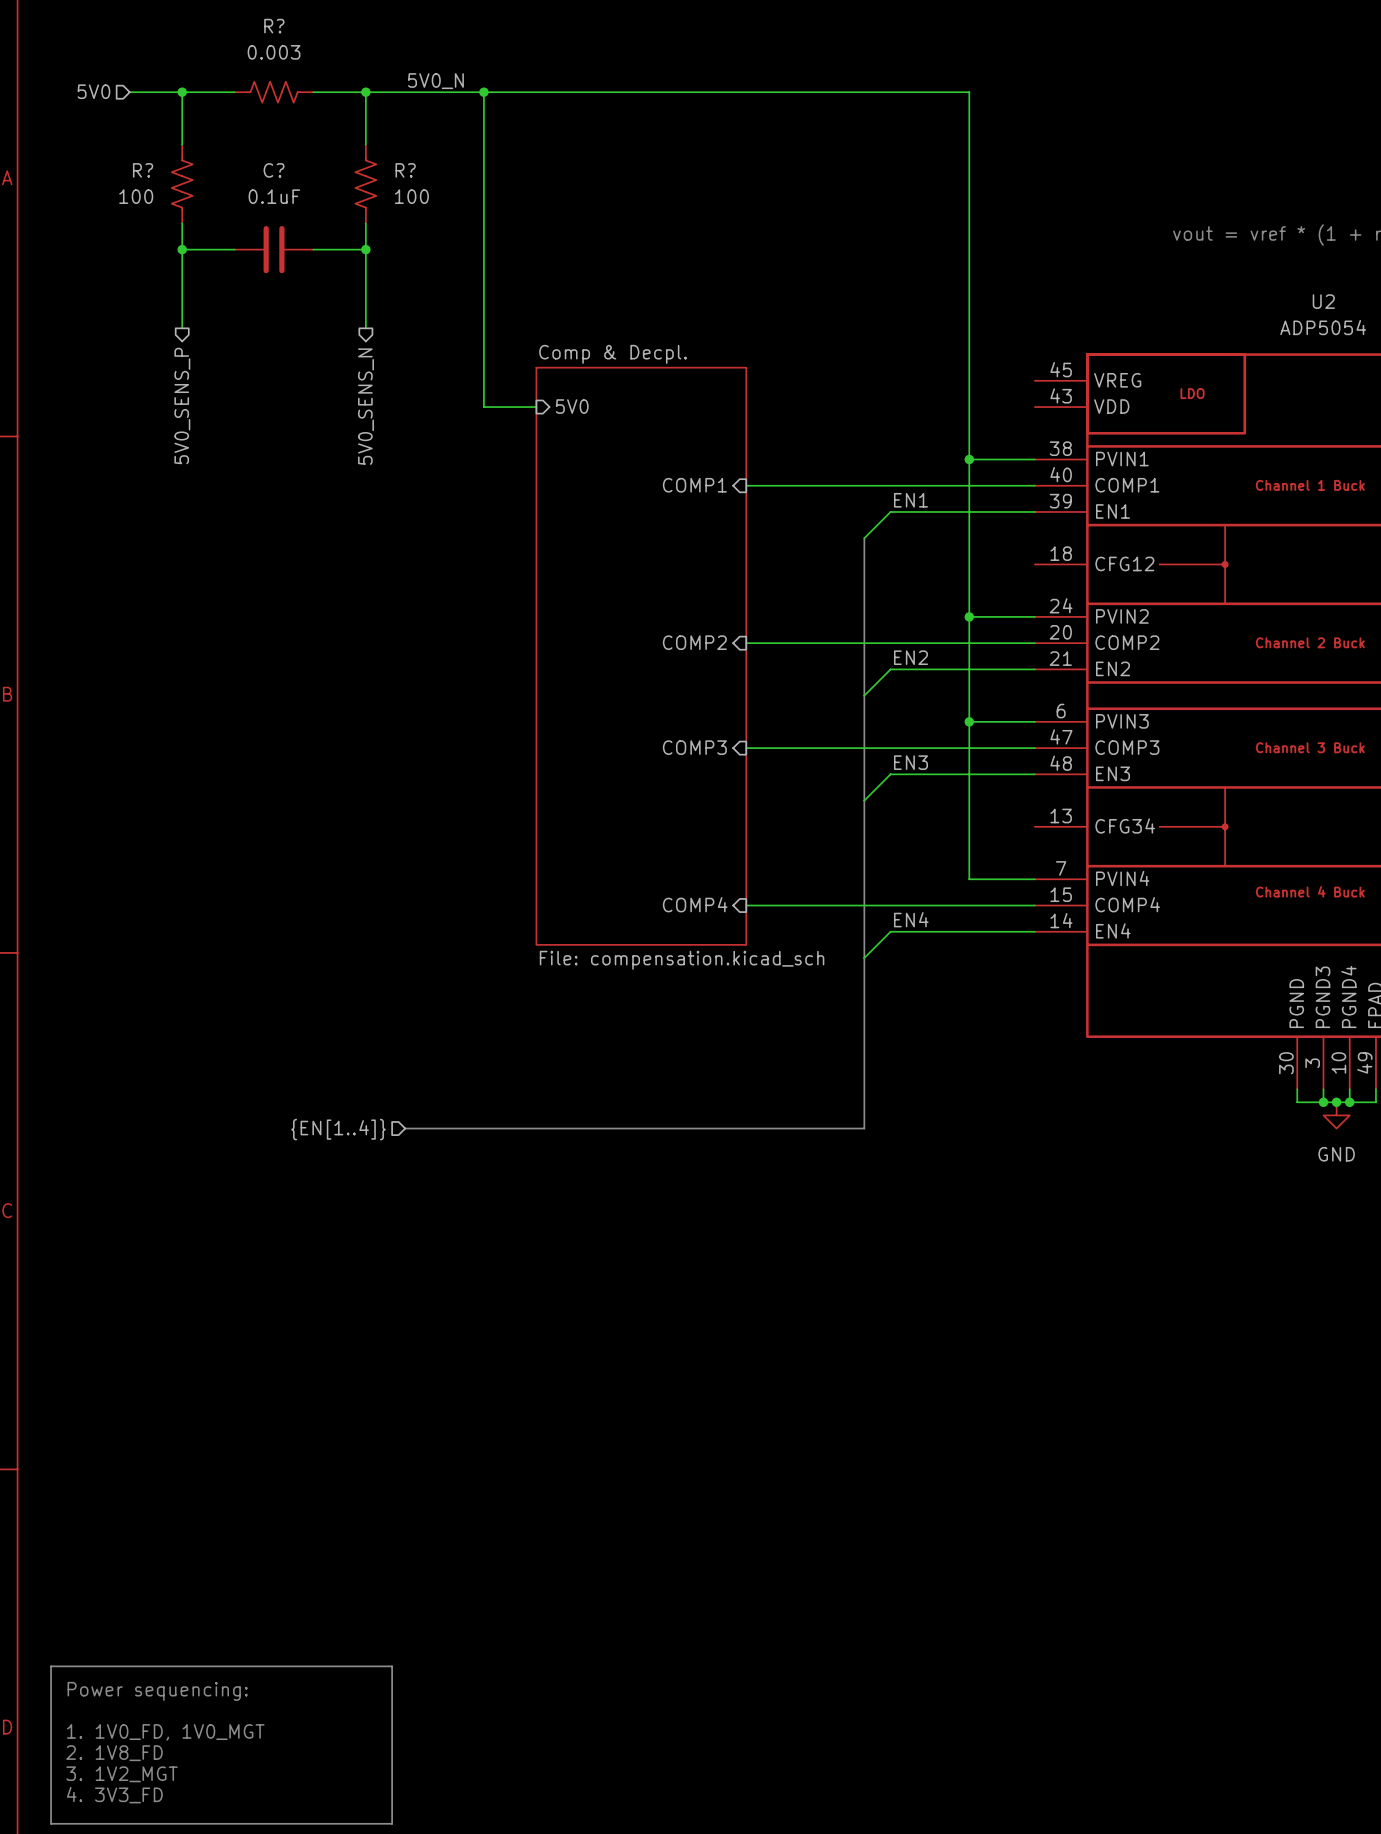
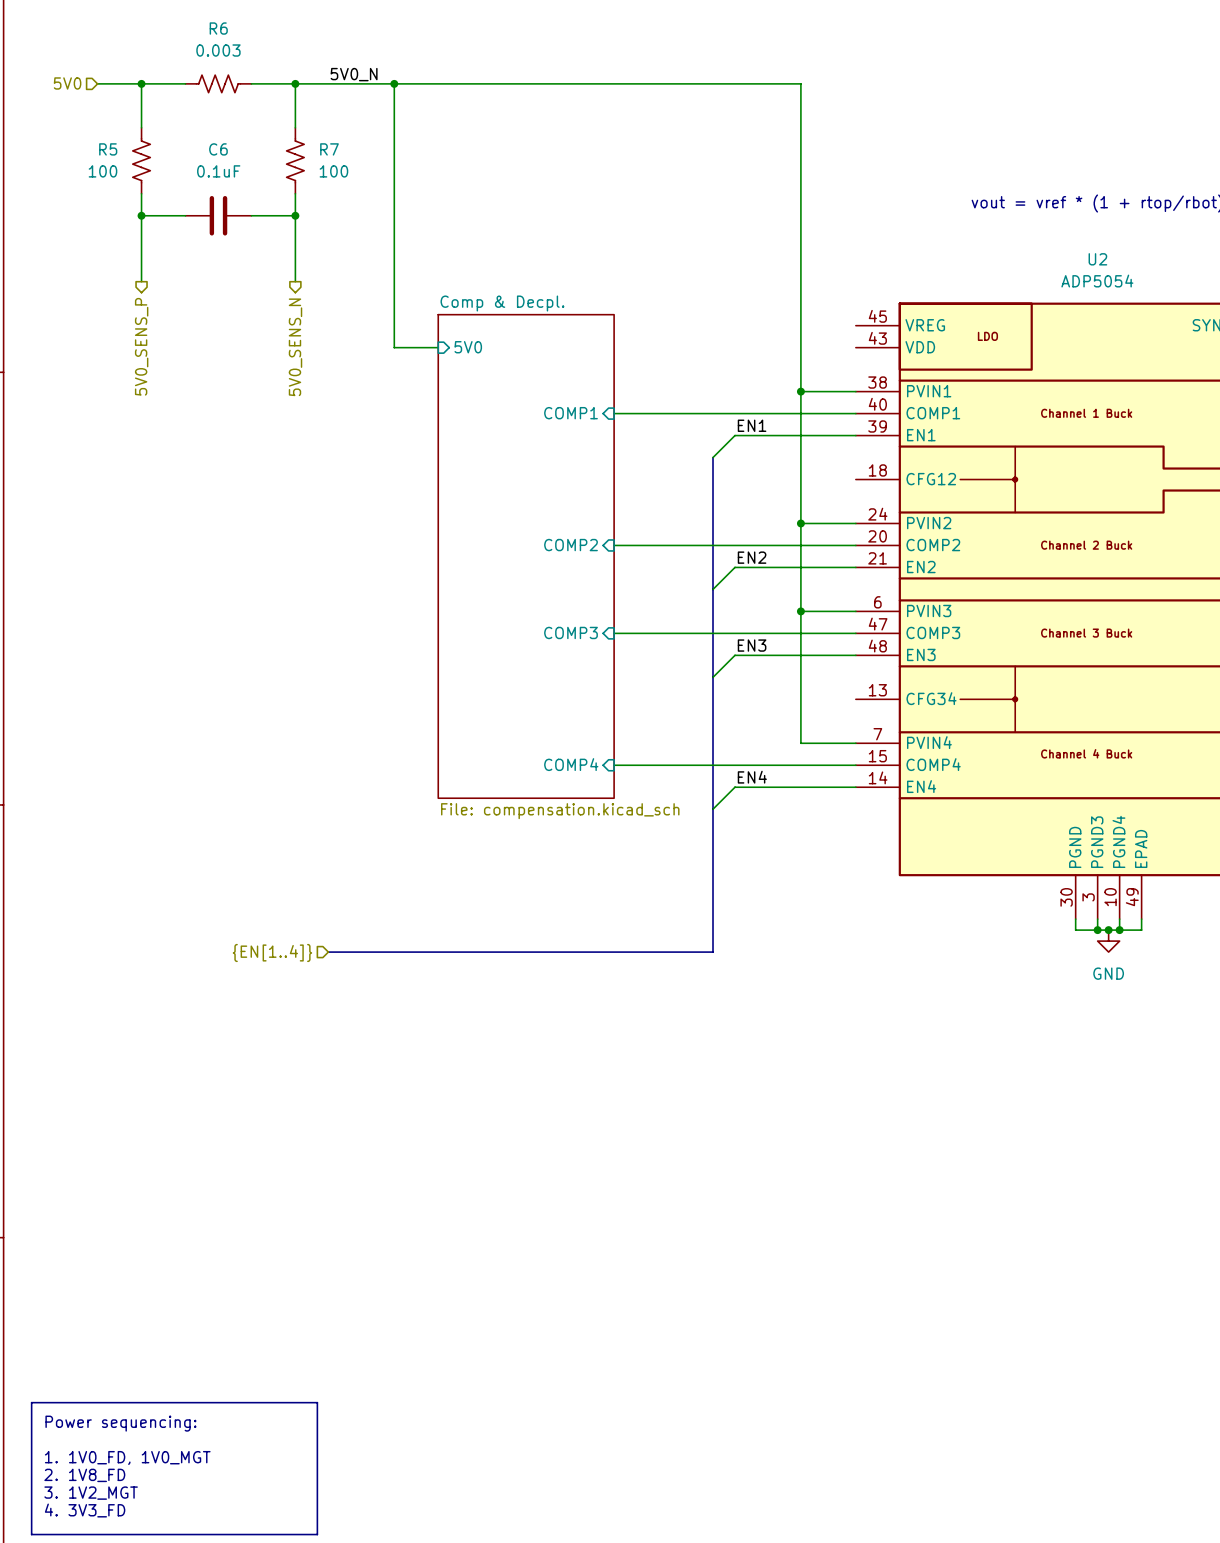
R? name: R? (274, 26) -> R6 (218, 28)
R? name: R? (143, 170) -> R5 (108, 149)
C? name: C? (274, 170) -> C6 (218, 149)
R? name: R? (405, 170) -> R7 (329, 149)

